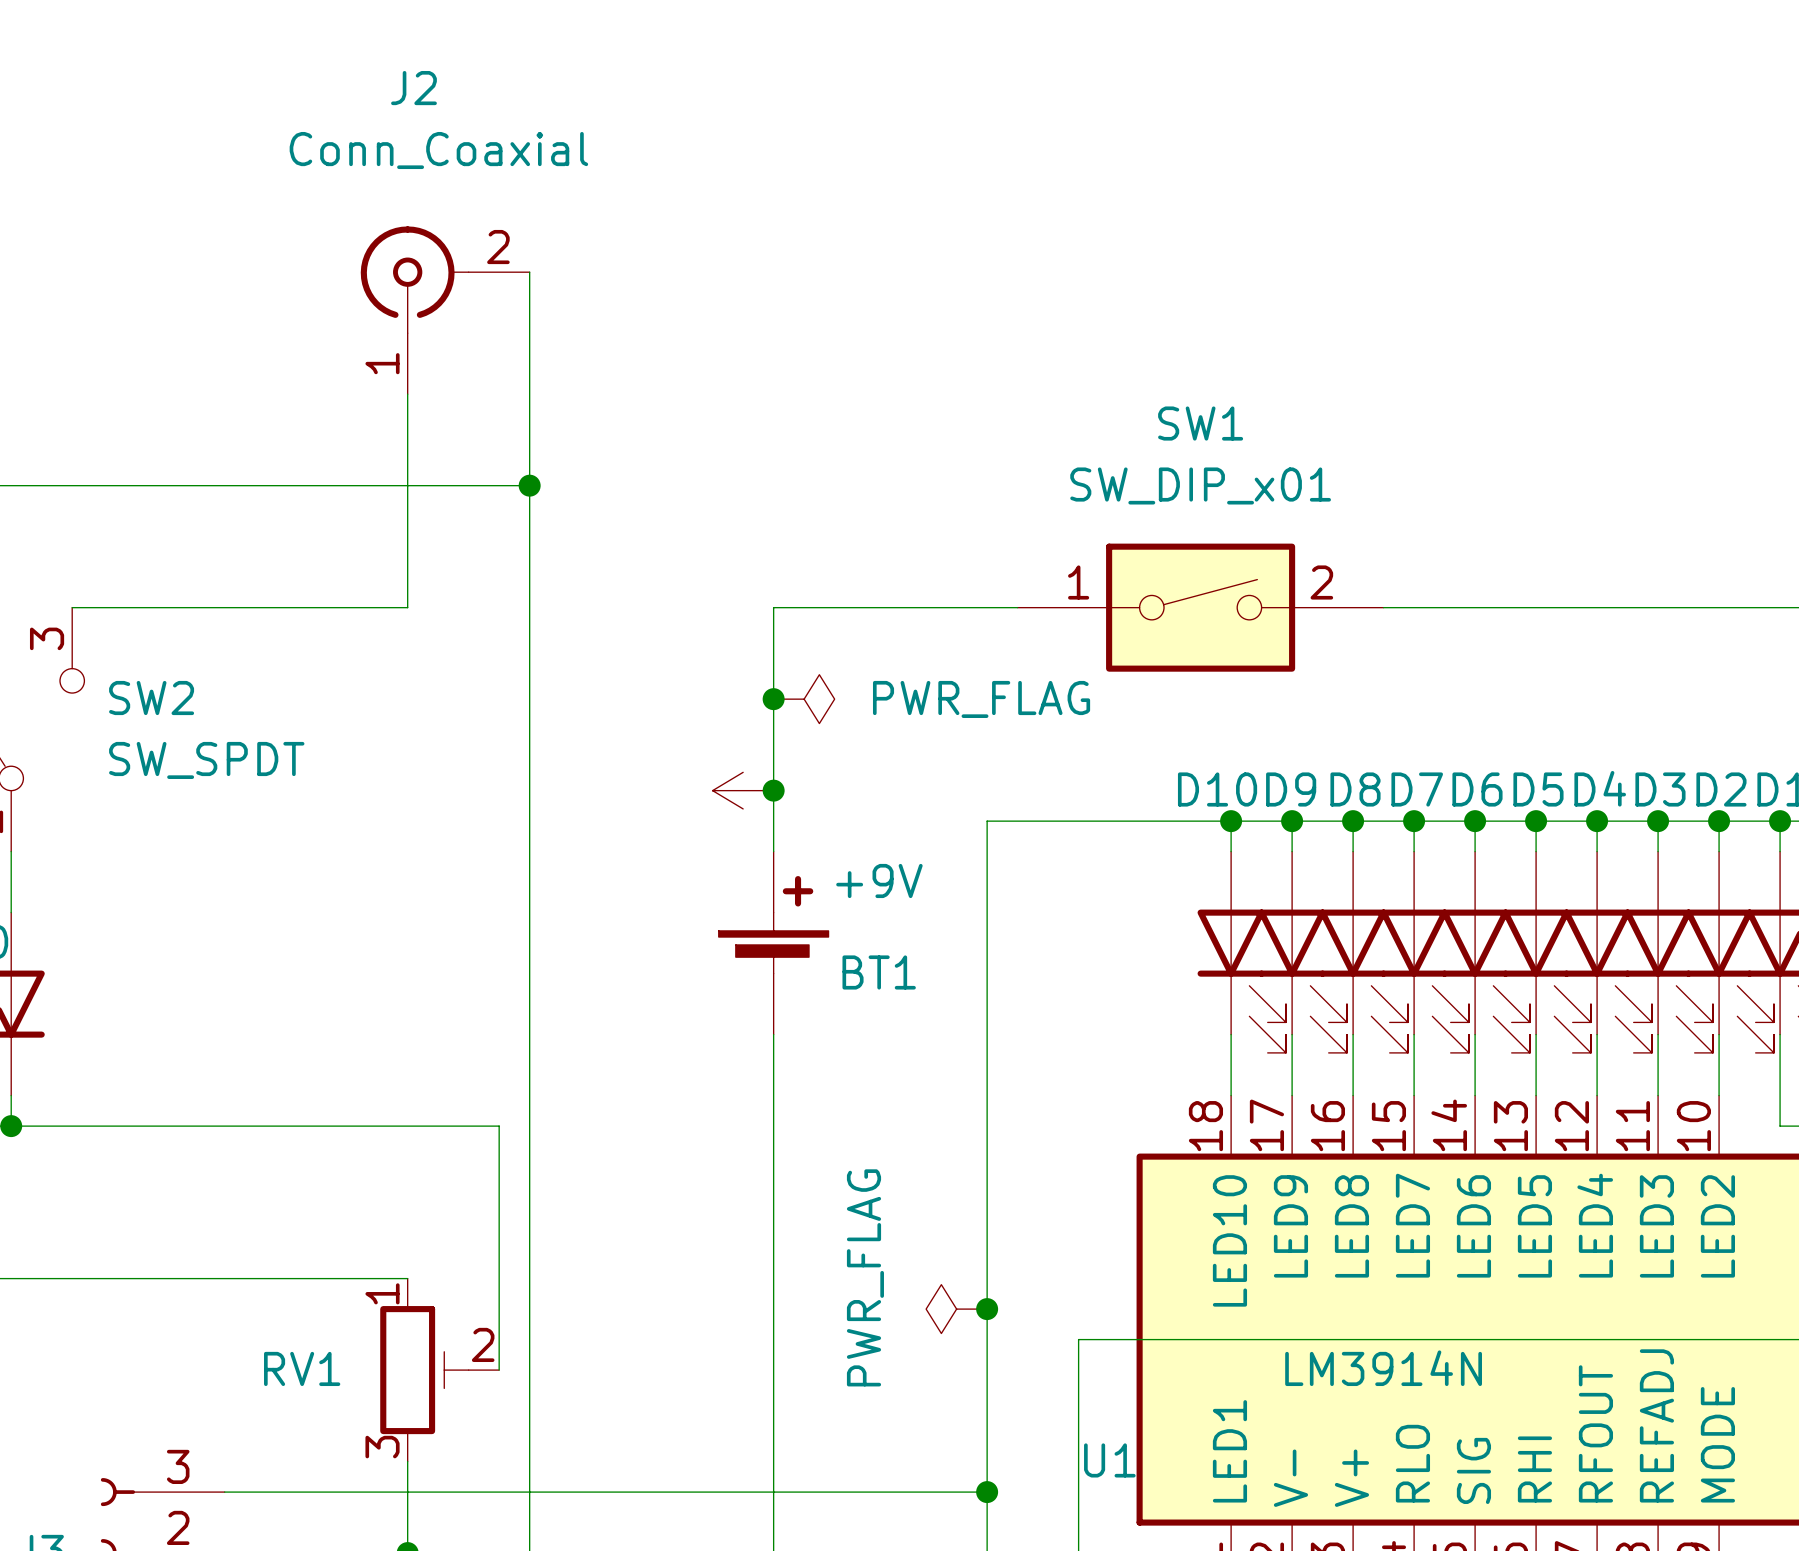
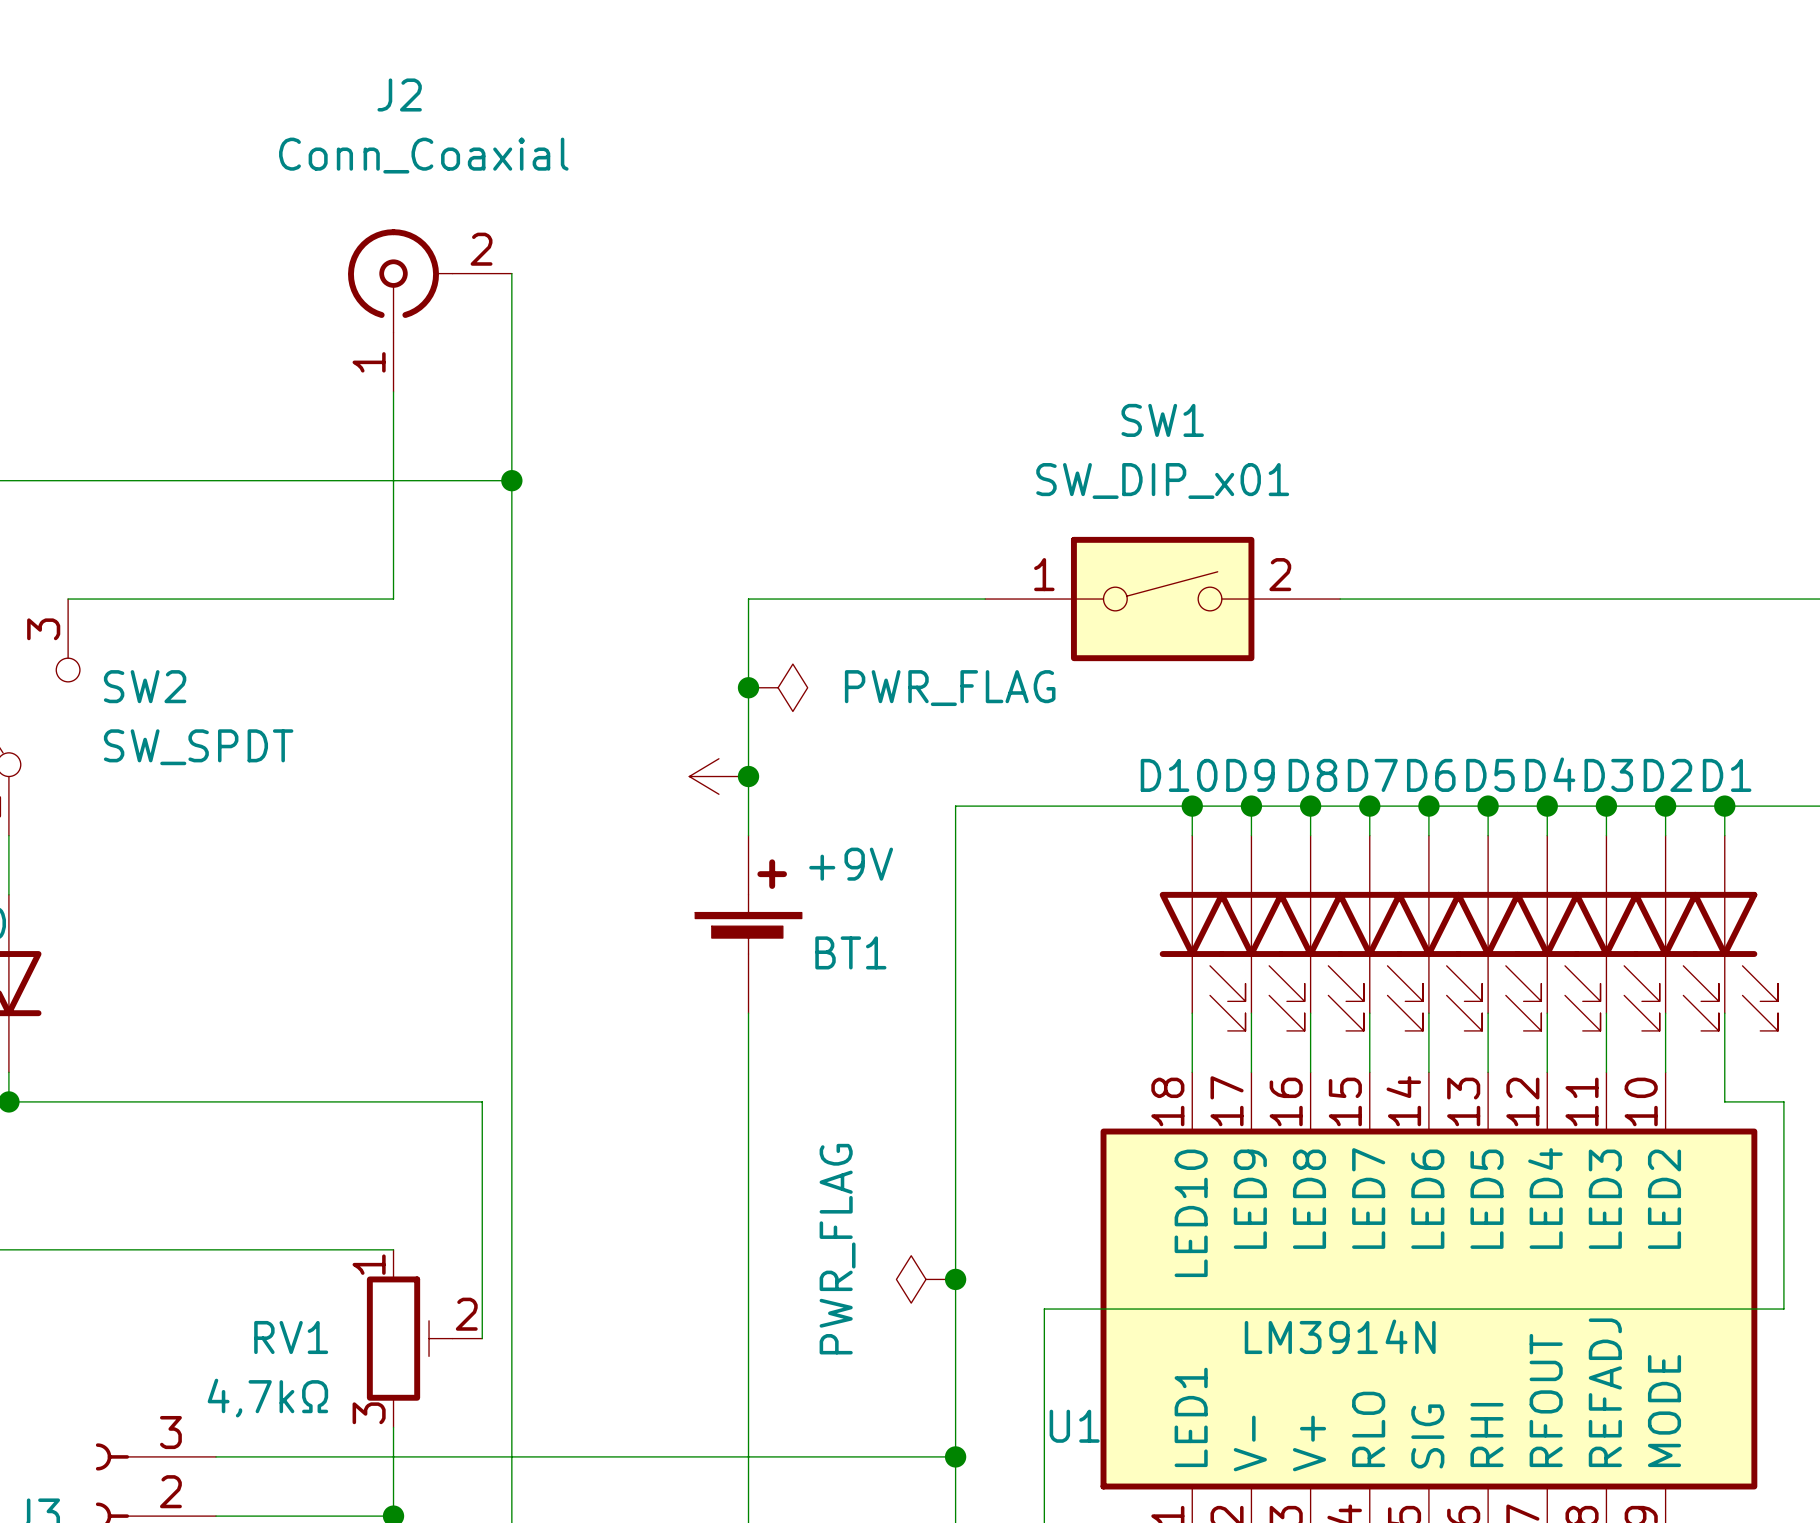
RV1 value: none -> 4,7kΩ (267, 1398)

